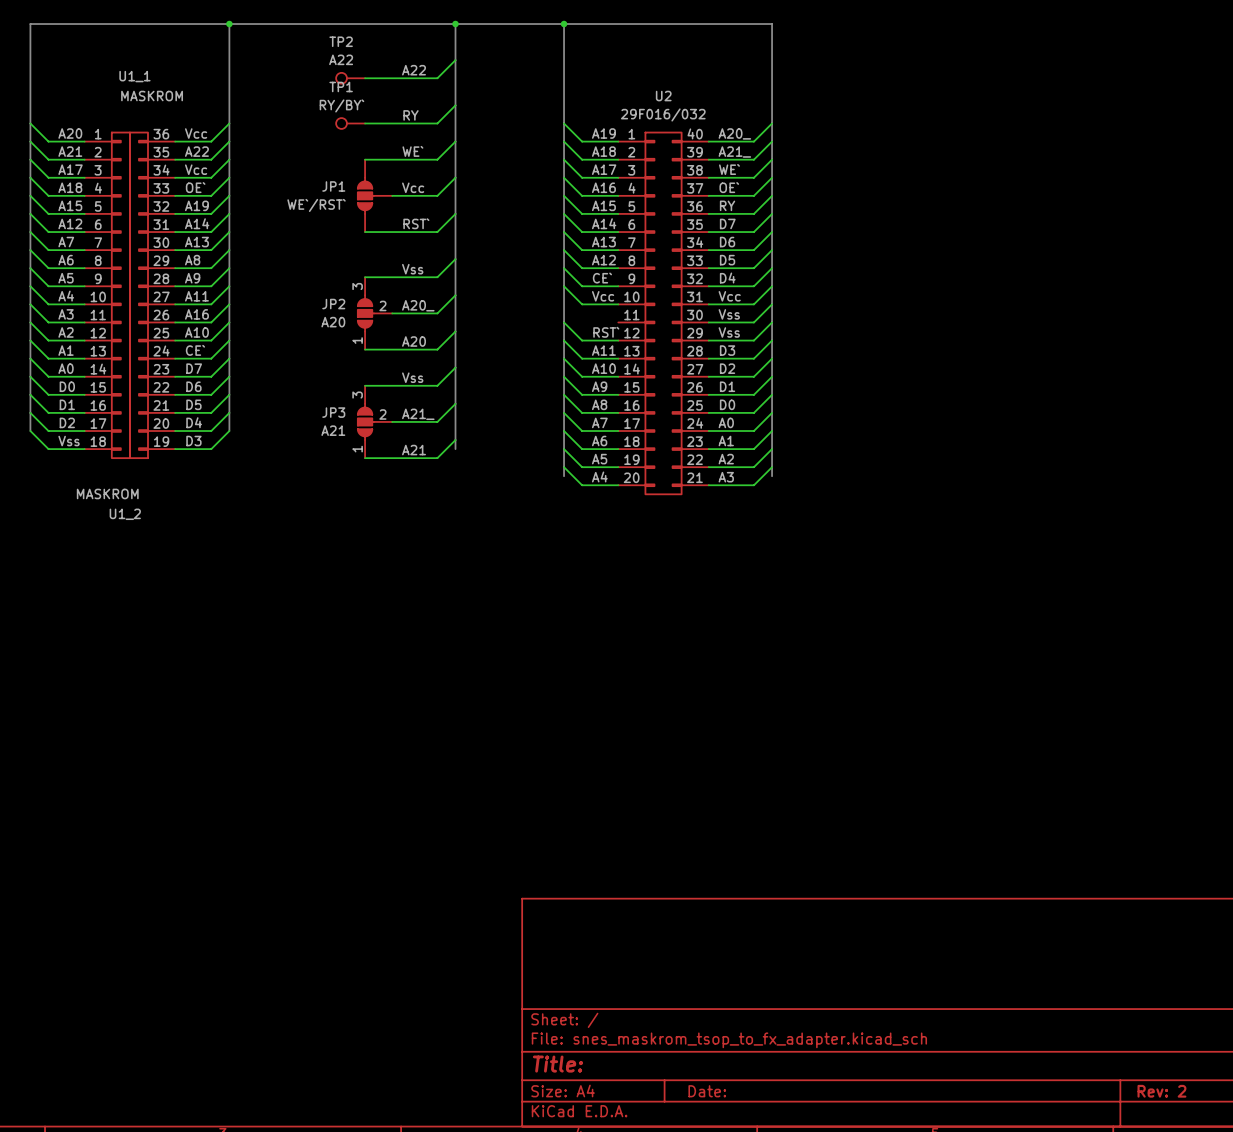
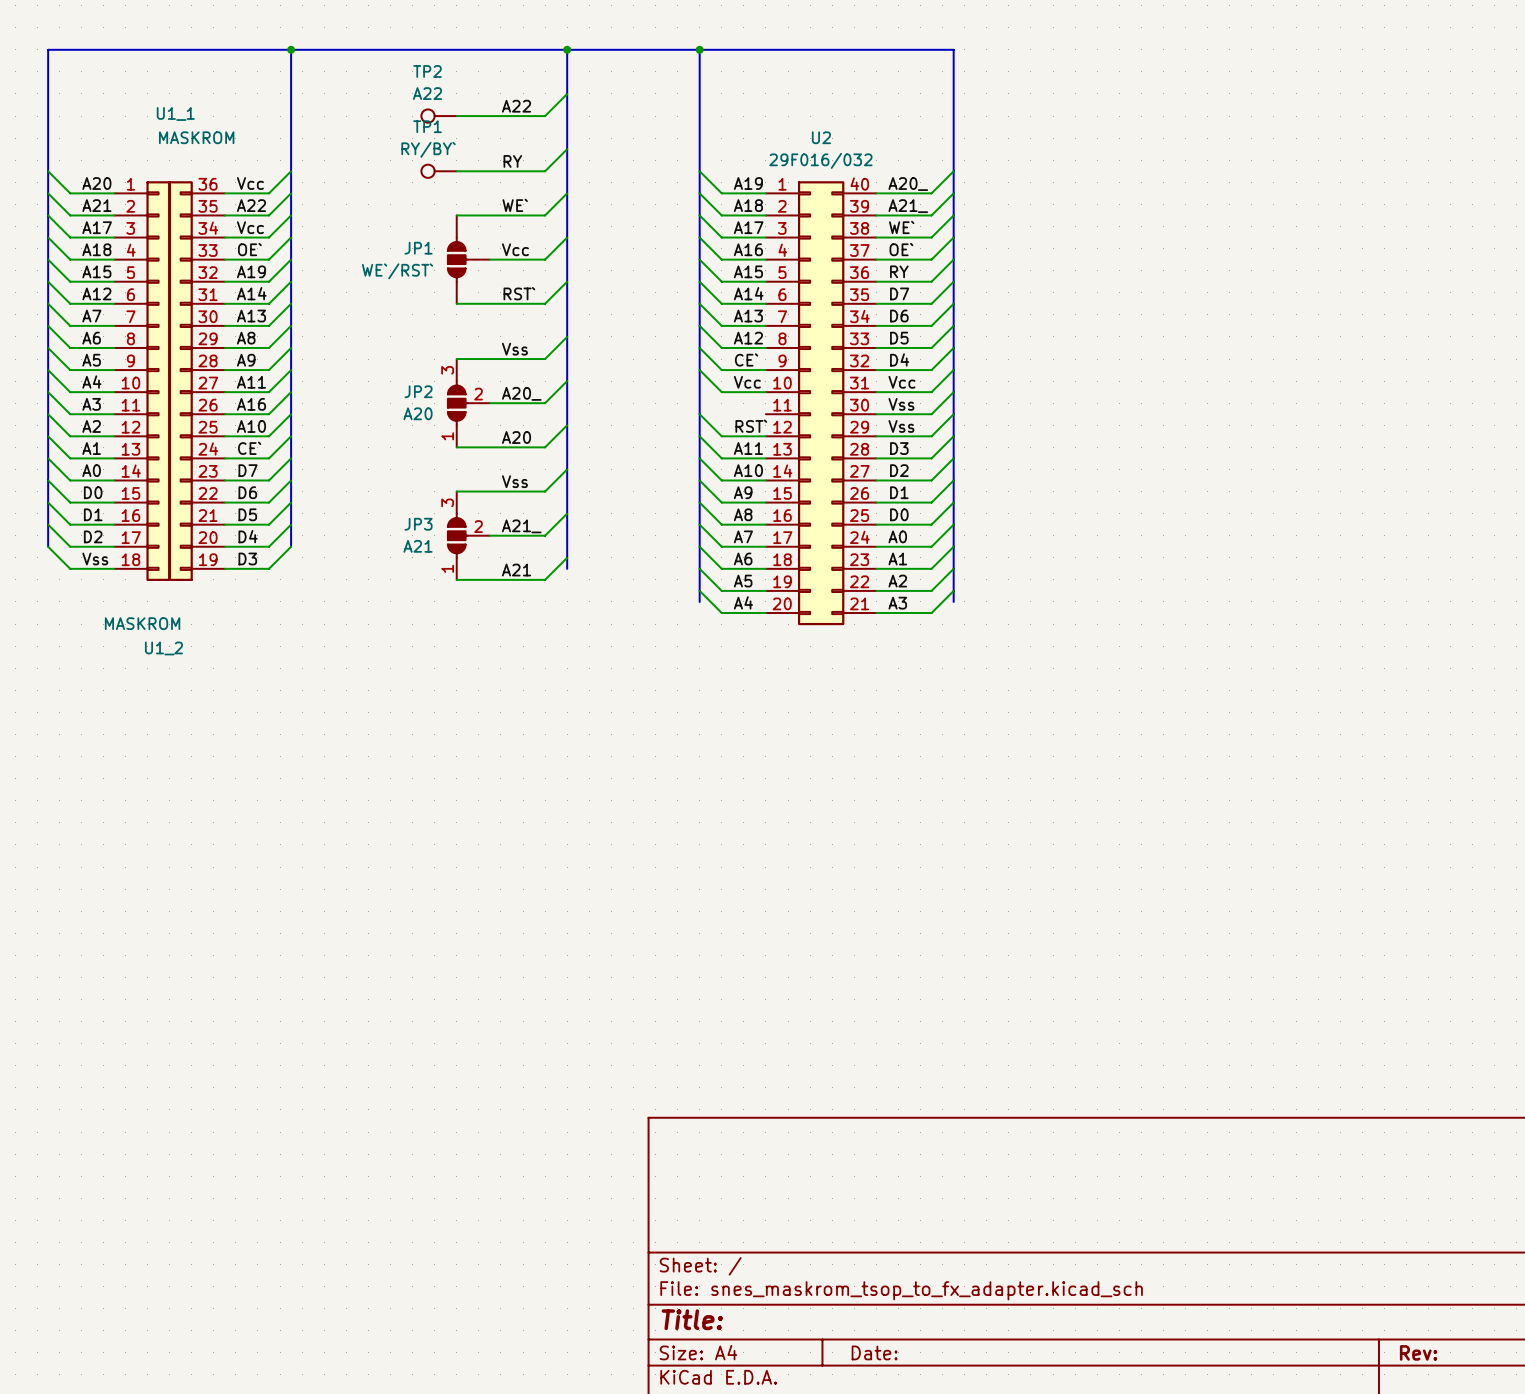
title block: Rev: 2 (1161, 1091) -> Rev: (1418, 1352)

